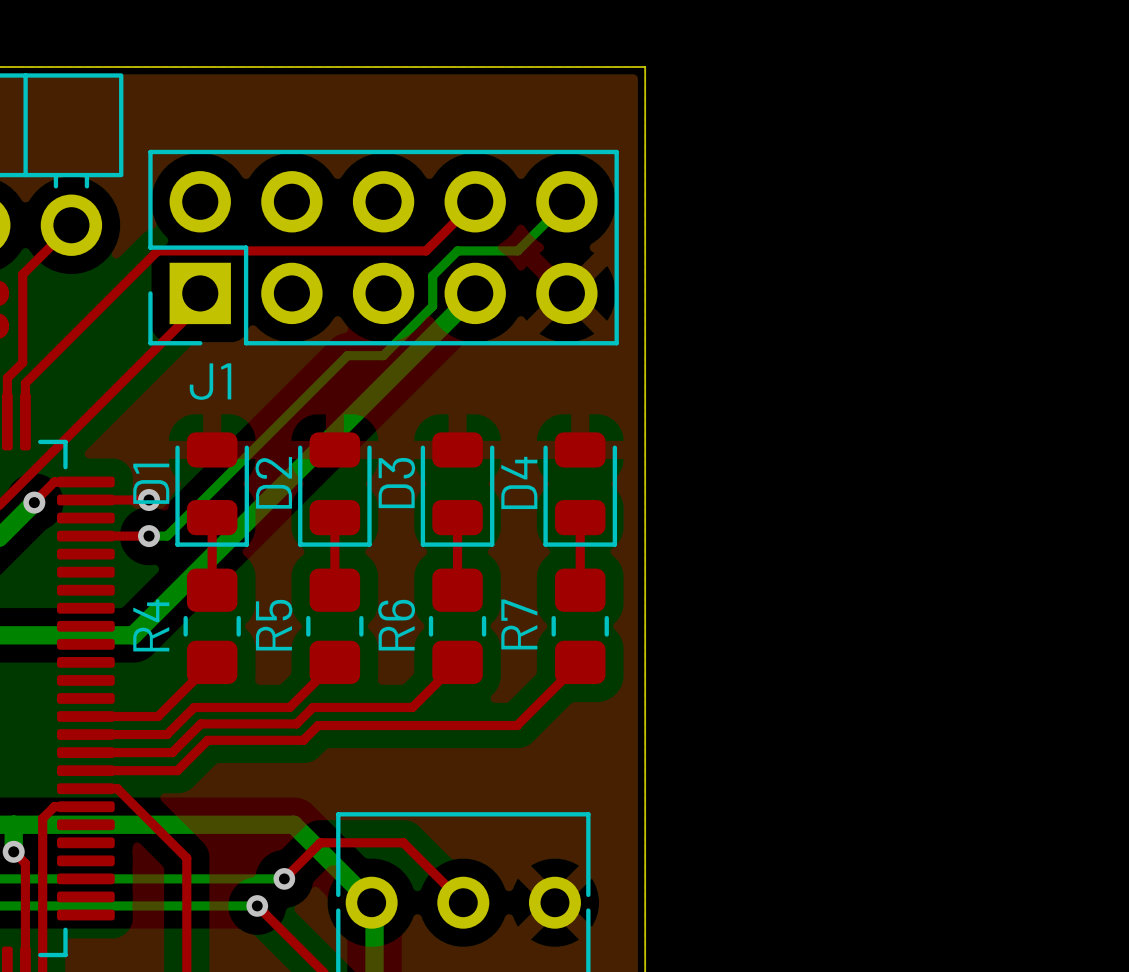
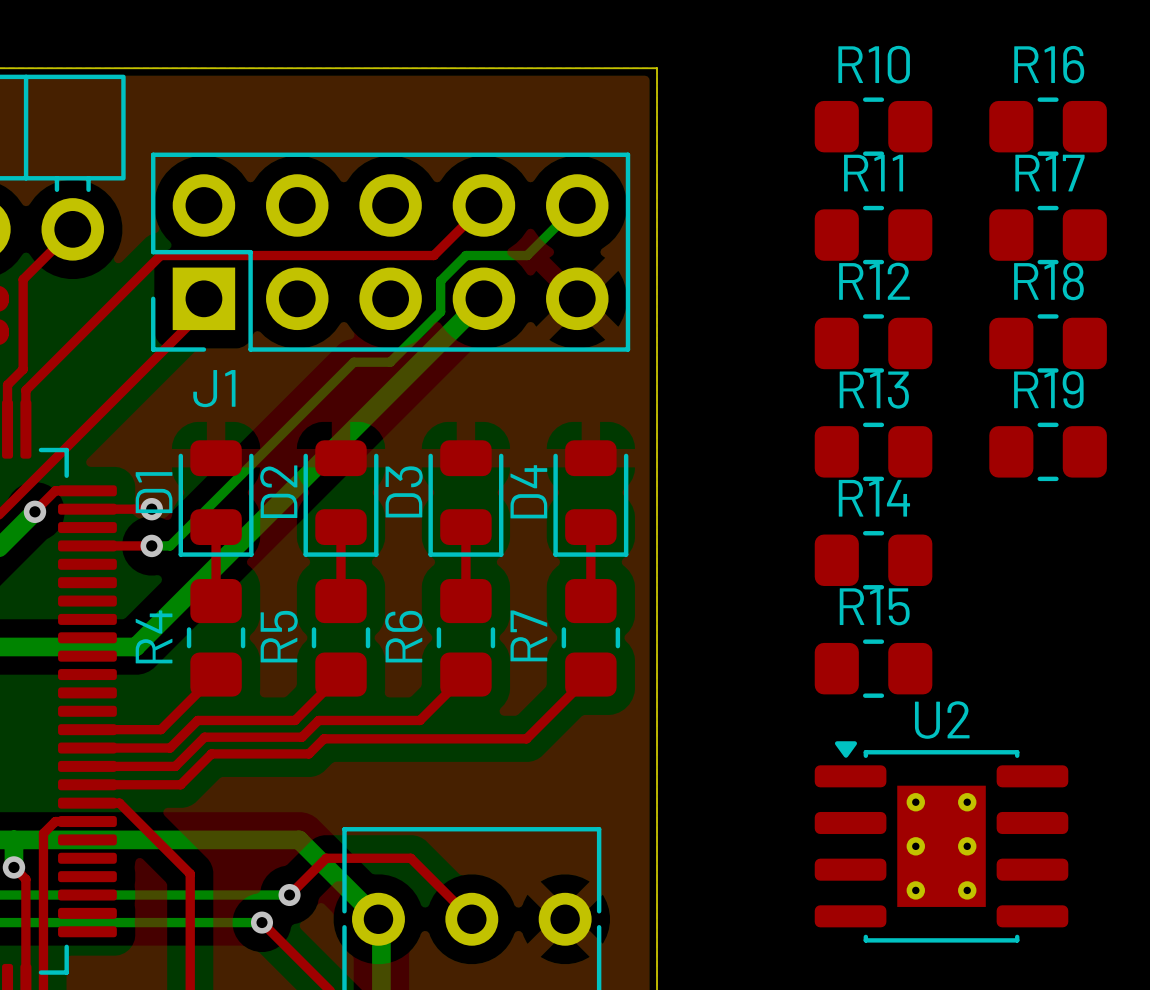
R10: none -> (873, 126)
R16: none -> (1048, 126)
R11: none -> (873, 235)
R17: none -> (1048, 235)
R12: none -> (873, 343)
R18: none -> (1048, 343)
R13: none -> (873, 451)
R19: none -> (1048, 451)
R14: none -> (873, 560)
R15: none -> (873, 668)
U2: none -> (941, 841)

